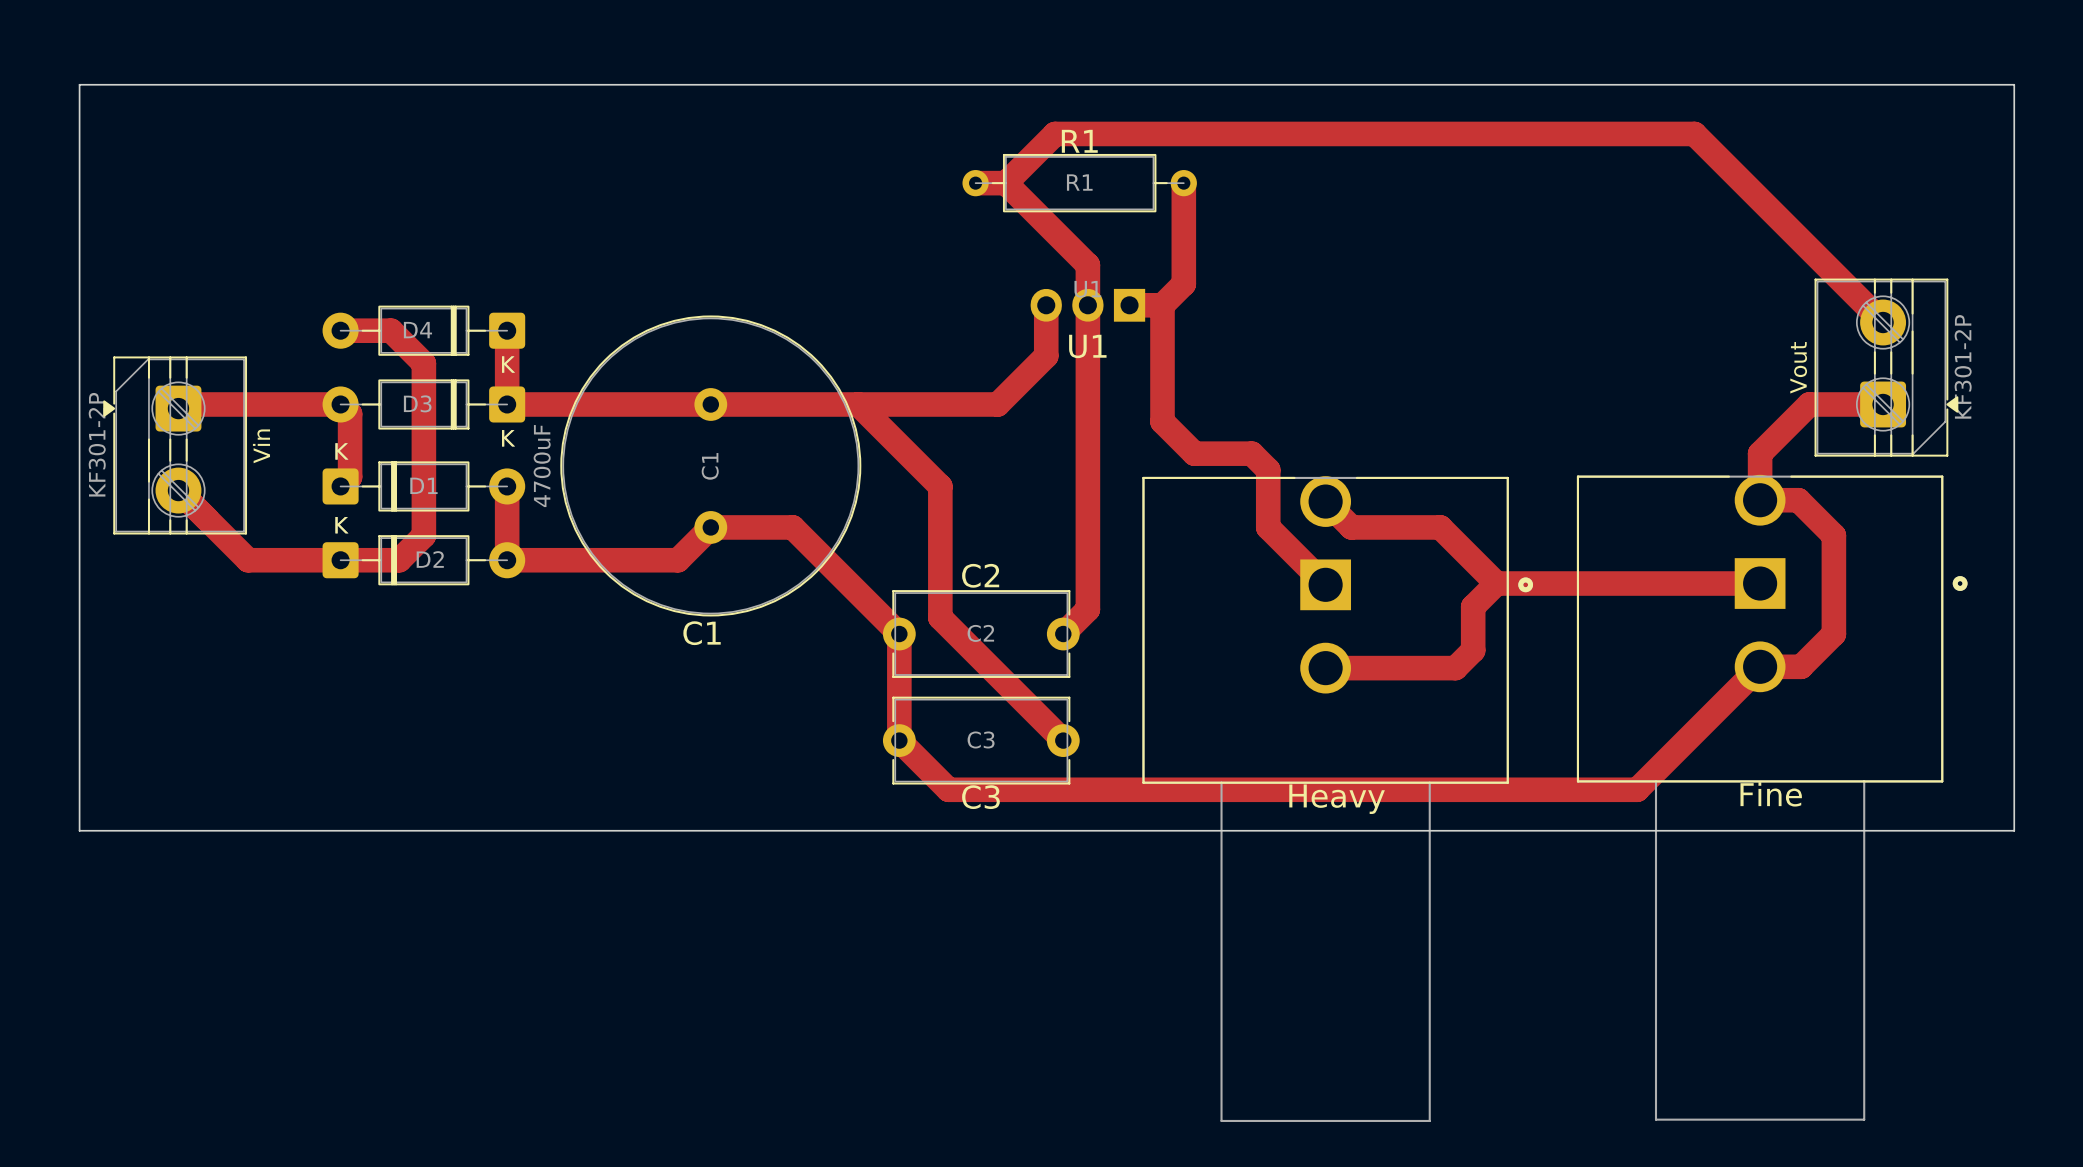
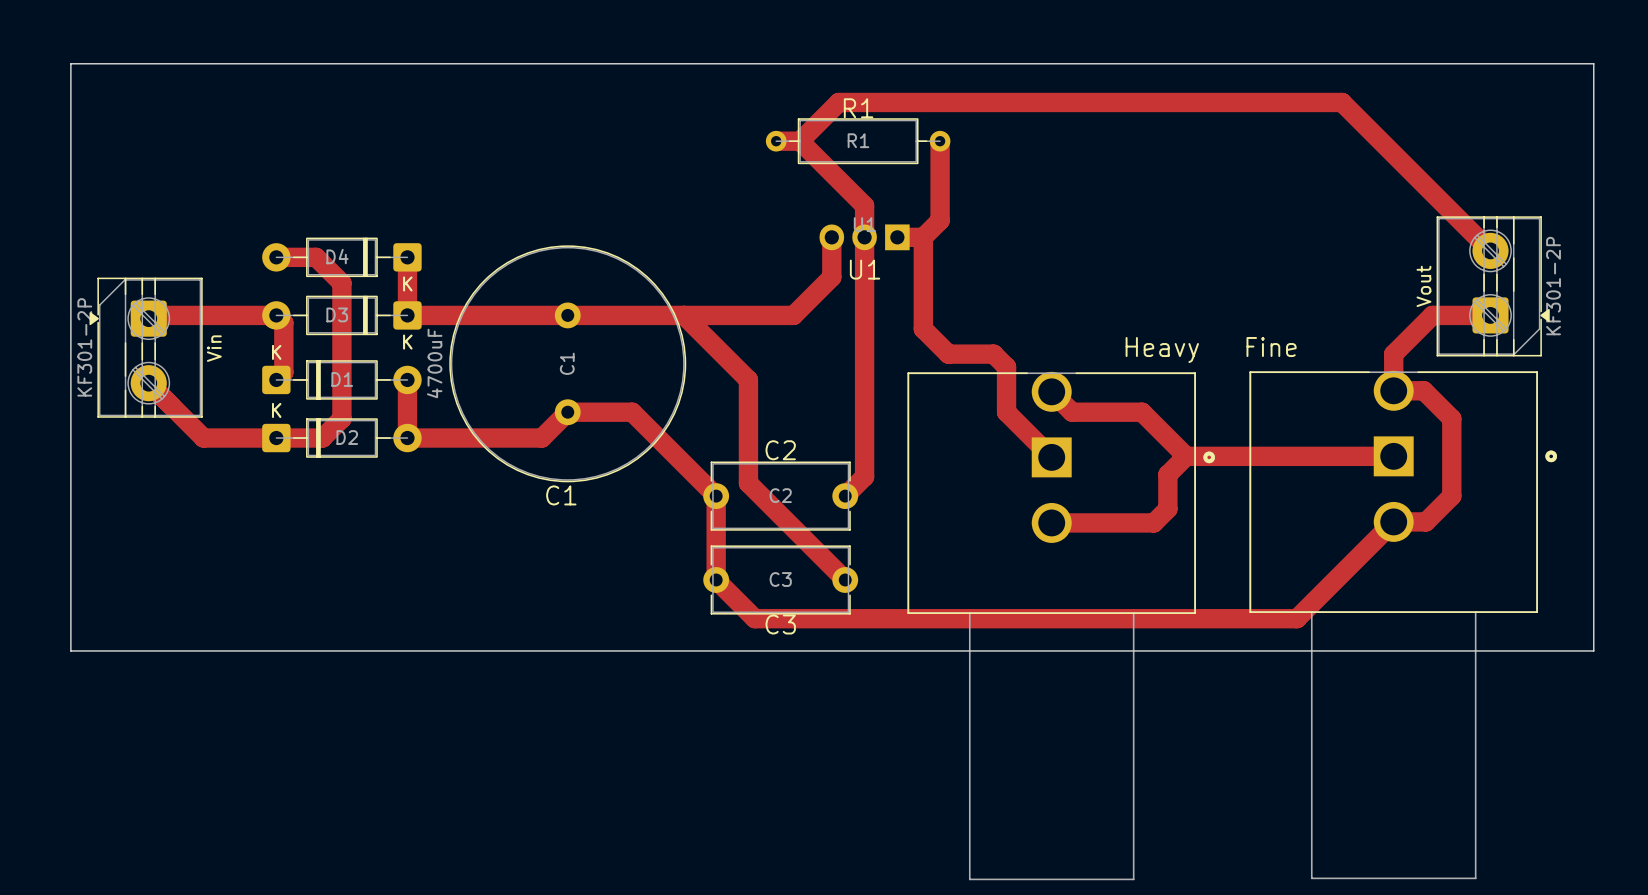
Fine name position: Fine (1771, 794) -> Fine (1271, 347)
Heavy name position: Heavy (1337, 799) -> Heavy (1162, 350)

